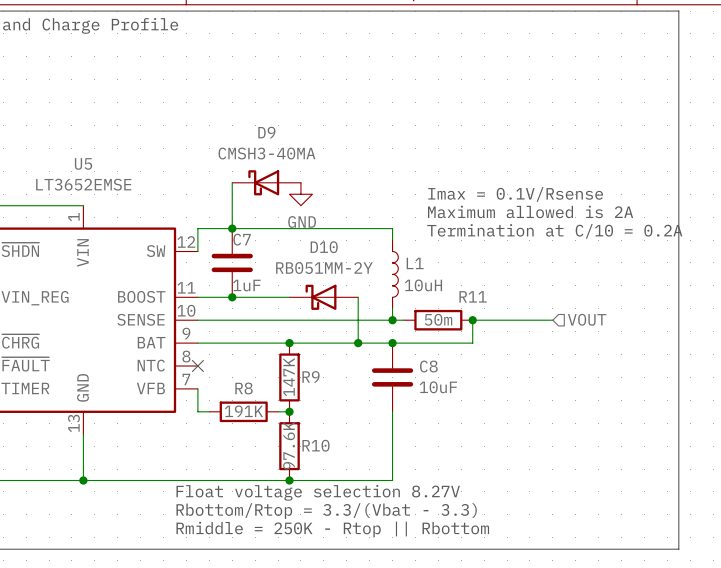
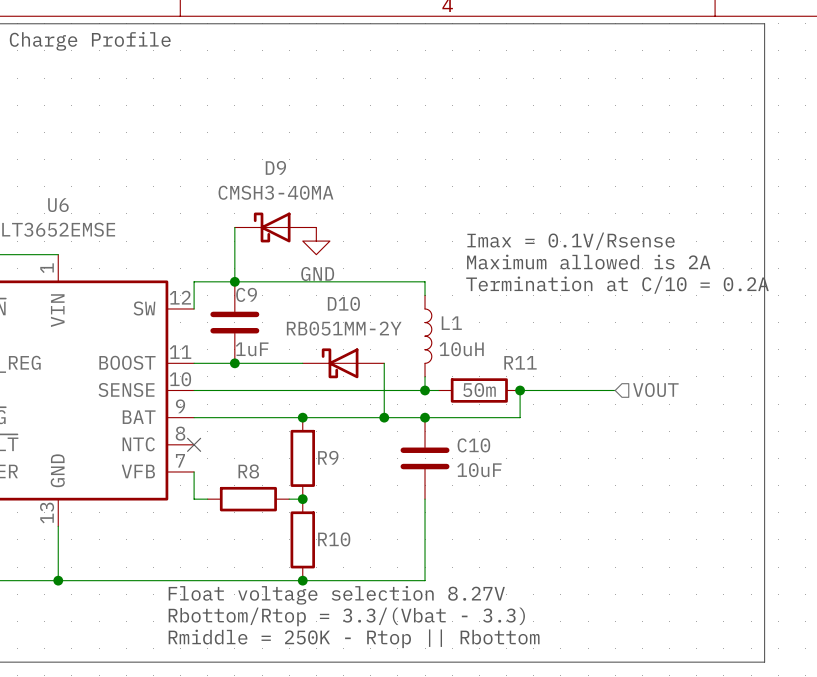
U5 name: U5 (83, 163) -> U6 (58, 205)
C7 name: C7 (242, 239) -> C9 (246, 294)
C8 name: C8 (428, 366) -> C10 (473, 445)
R9 value: 147K (289, 377) -> none
R8 value: 191K (243, 411) -> none
R10 value: 97.6K (289, 445) -> none

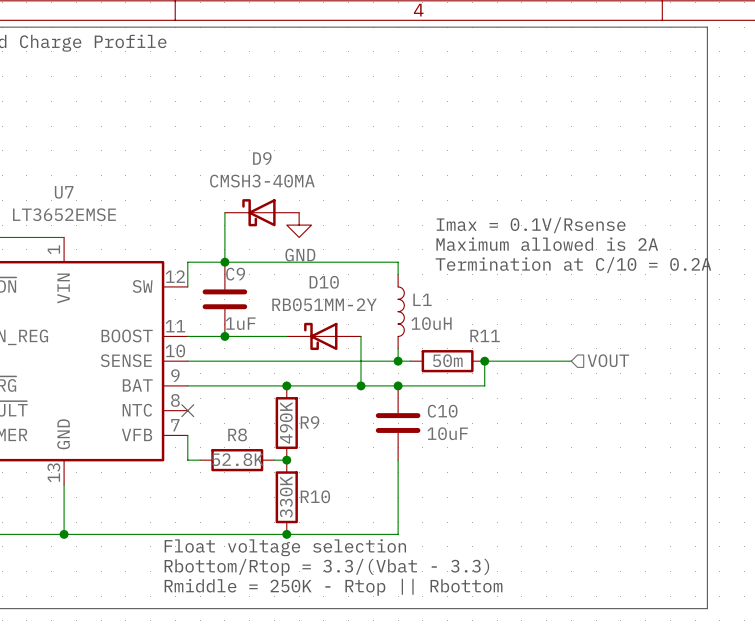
U6 name: U6 (58, 205) -> U7 (64, 192)
R9 value: none -> 490K (286, 422)
R8 value: none -> 52.8K (237, 459)
R10 value: none -> 330K (286, 497)
text: Float voltage selection 8.27V (336, 595) -> Float voltage selection (285, 547)

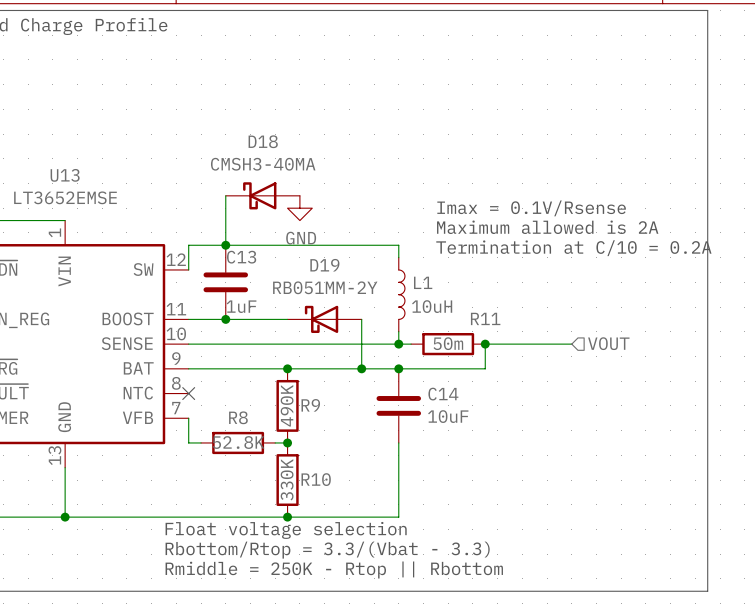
D9 name: D9 (262, 158) -> D18 (263, 141)
U7 name: U7 (64, 192) -> U13 (65, 175)
C9 name: C9 (235, 274) -> C13 (241, 257)
D10 name: D10 (324, 282) -> D19 (324, 265)
C10 name: C10 (442, 411) -> C14 (443, 394)

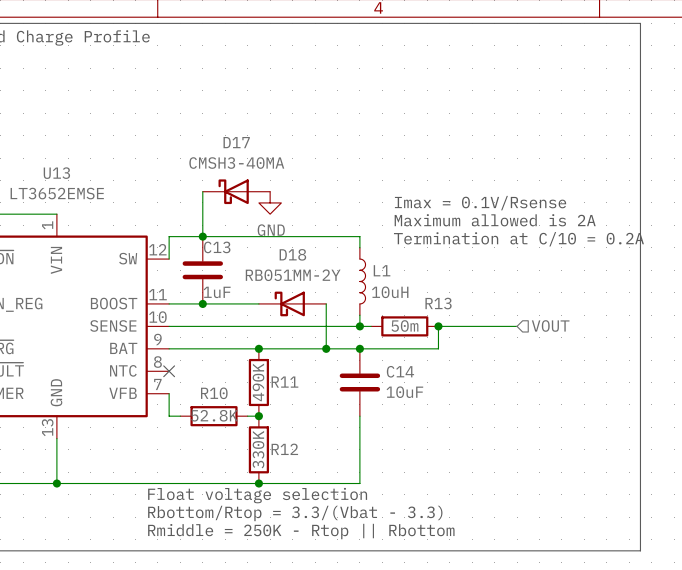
D18 name: D18 (263, 141) -> D17 (236, 142)
D19 name: D19 (324, 265) -> D18 (292, 254)
R11 name: R11 (485, 318) -> R13 (438, 303)
R9 name: R9 (310, 405) -> R11 (284, 382)
R8 name: R8 (238, 417) -> R10 (214, 393)
R10 name: R10 (316, 479) -> R12 (284, 449)

